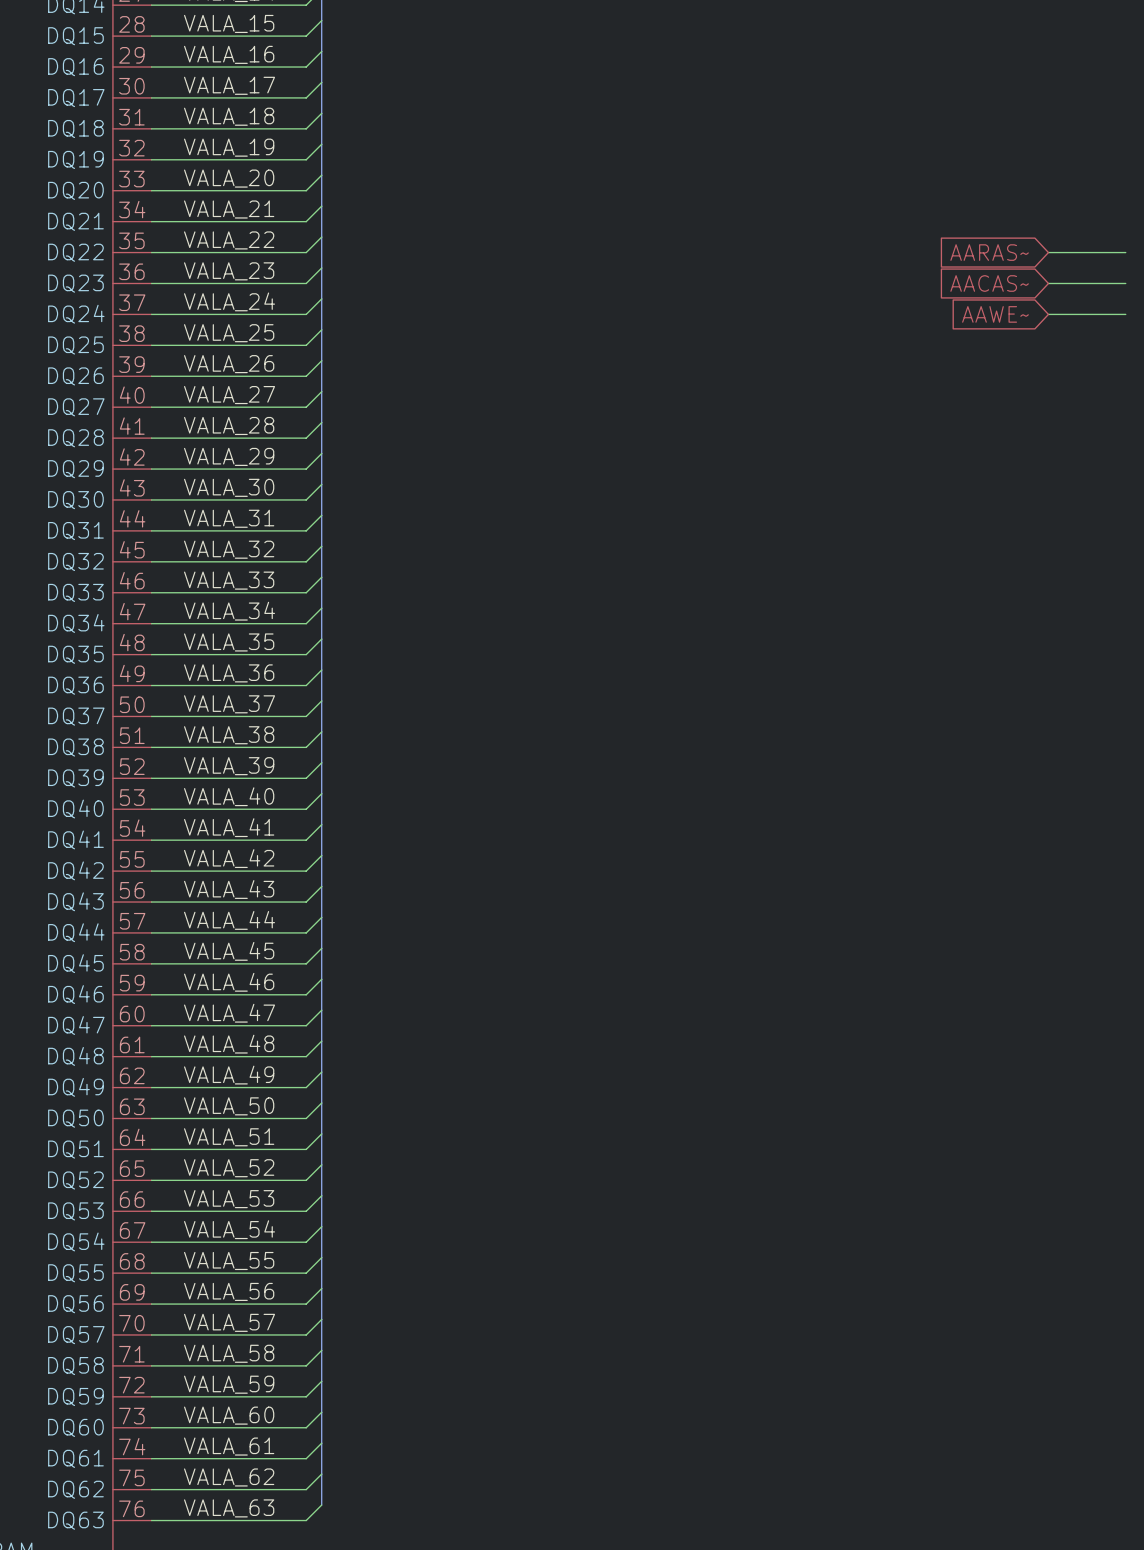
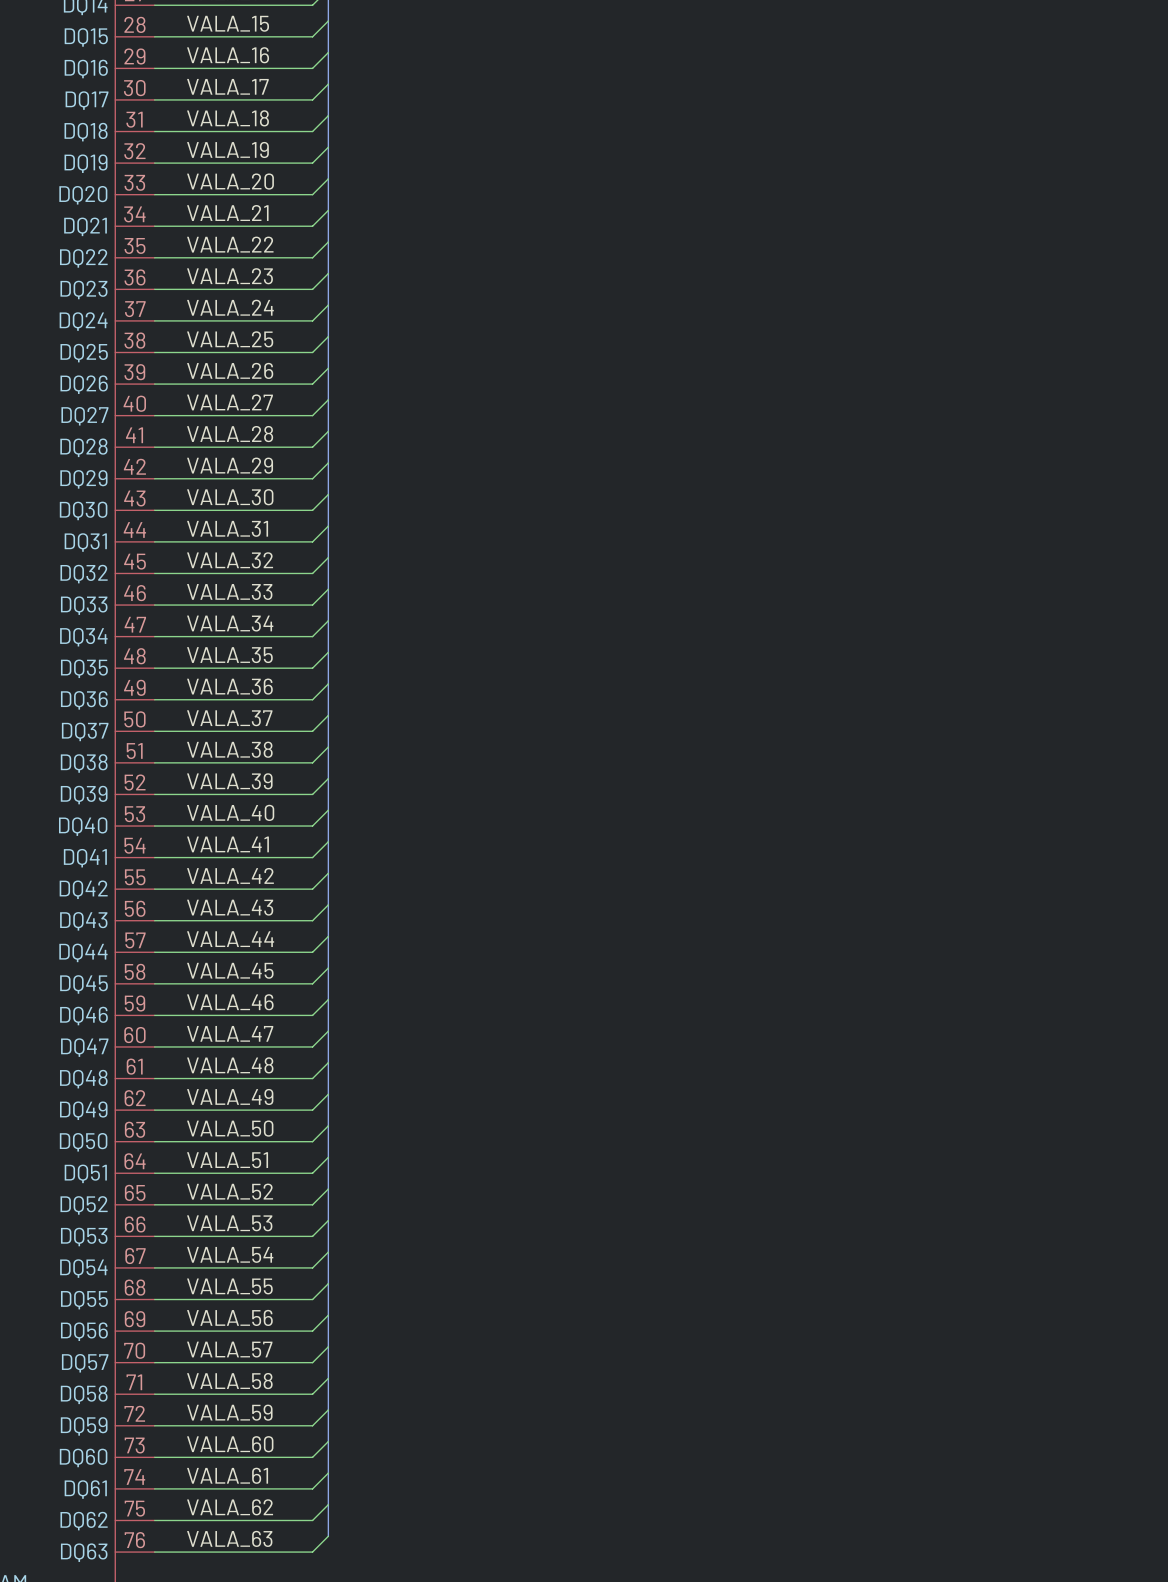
global label: AARAS~ (989, 252) -> none
wire: (1048, 252) (1125, 252) -> none
global label: AACAS~ (989, 283) -> none
wire: (1048, 283) (1125, 283) -> none
global label: AAWE~ (995, 314) -> none
wire: (1048, 314) (1125, 314) -> none

